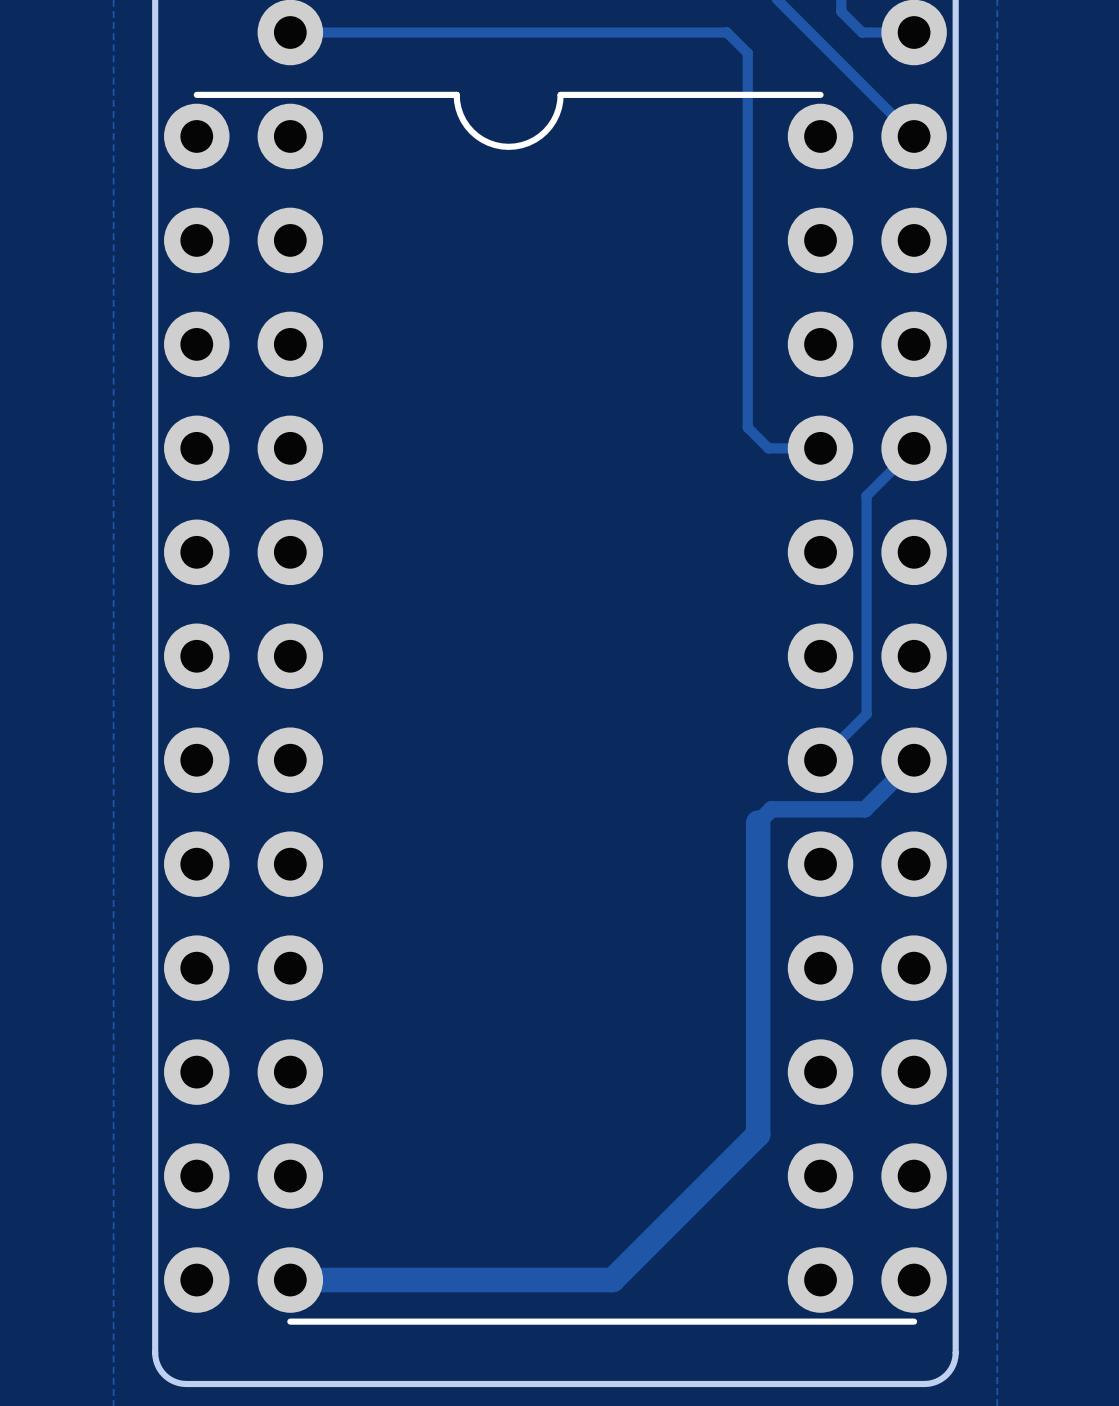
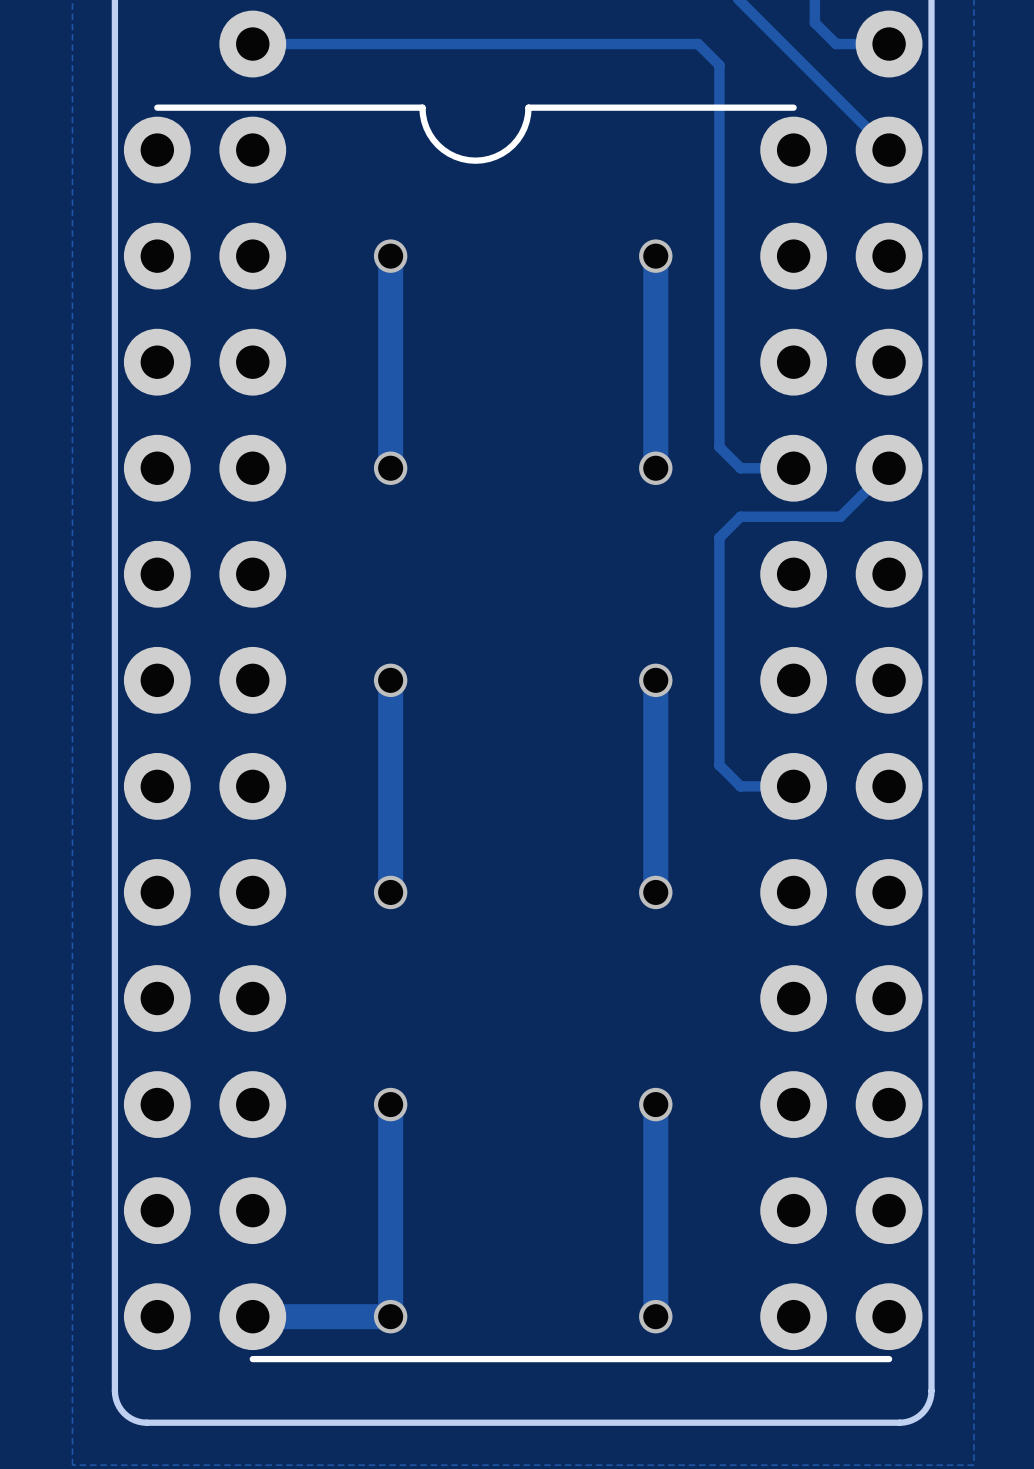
track: none -> (390, 256) (390, 468)
via: none -> (390, 256)
track: none -> (655, 256) (655, 468)
via: none -> (655, 256)
via: none -> (390, 468)
via: none -> (655, 468)
track: (866, 495) (866, 714) (820, 760) -> (840, 516) (740, 516) (719, 537) (719, 765) (740, 786) (793, 786)
track: none -> (390, 680) (390, 892)
via: none -> (390, 680)
track: none -> (655, 680) (655, 892)
via: none -> (655, 680)
track: (914, 760) (864, 809) (771, 809) (758, 822) (758, 1134) (612, 1280) (425, 1280) -> (390, 1104) (390, 1316)
via: none -> (390, 892)
via: none -> (655, 892)
via: none -> (390, 1104)
track: none -> (655, 1104) (655, 1316)
via: none -> (655, 1104)
via: none -> (390, 1316)
via: none -> (655, 1316)

